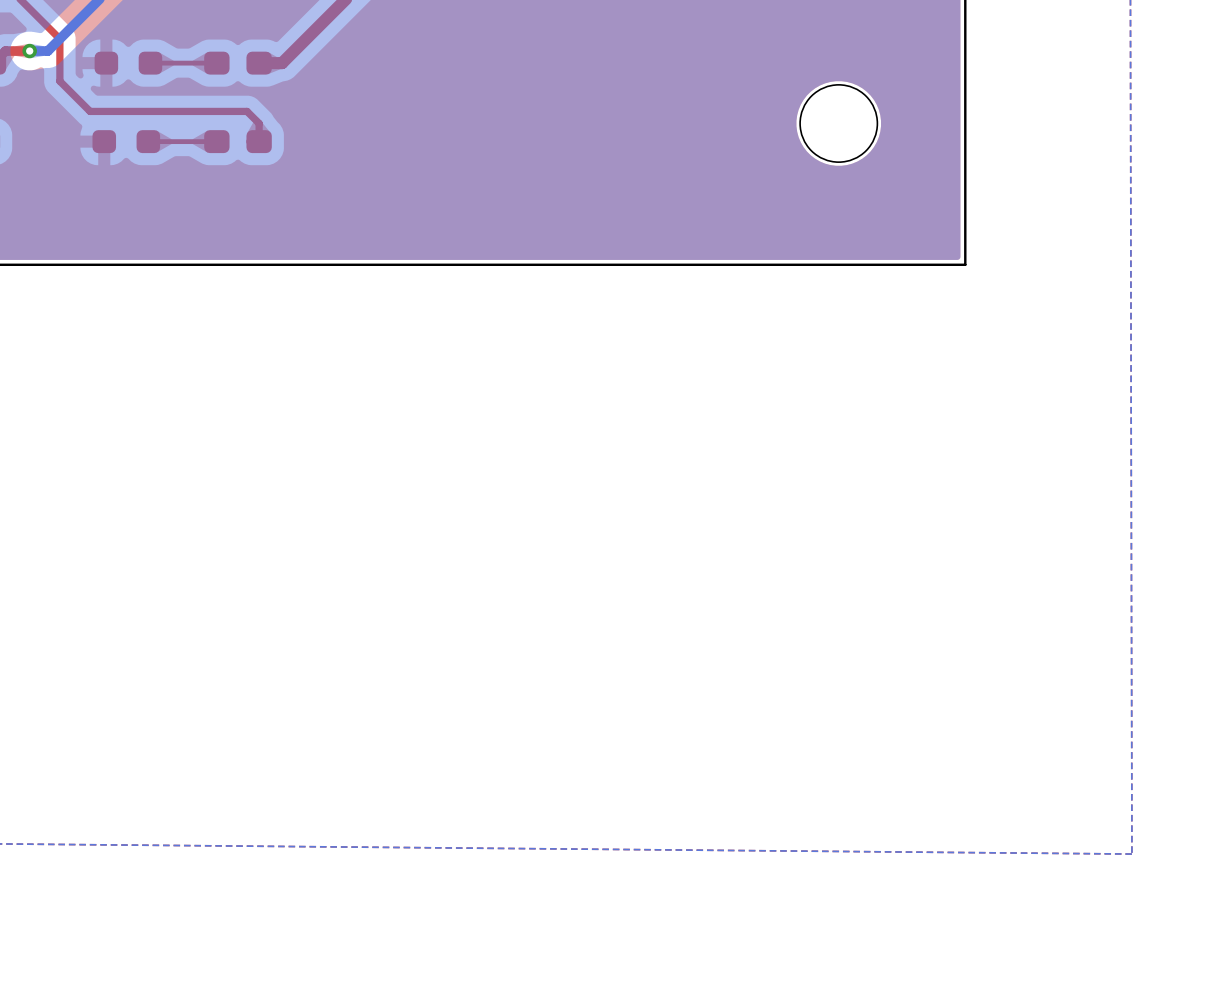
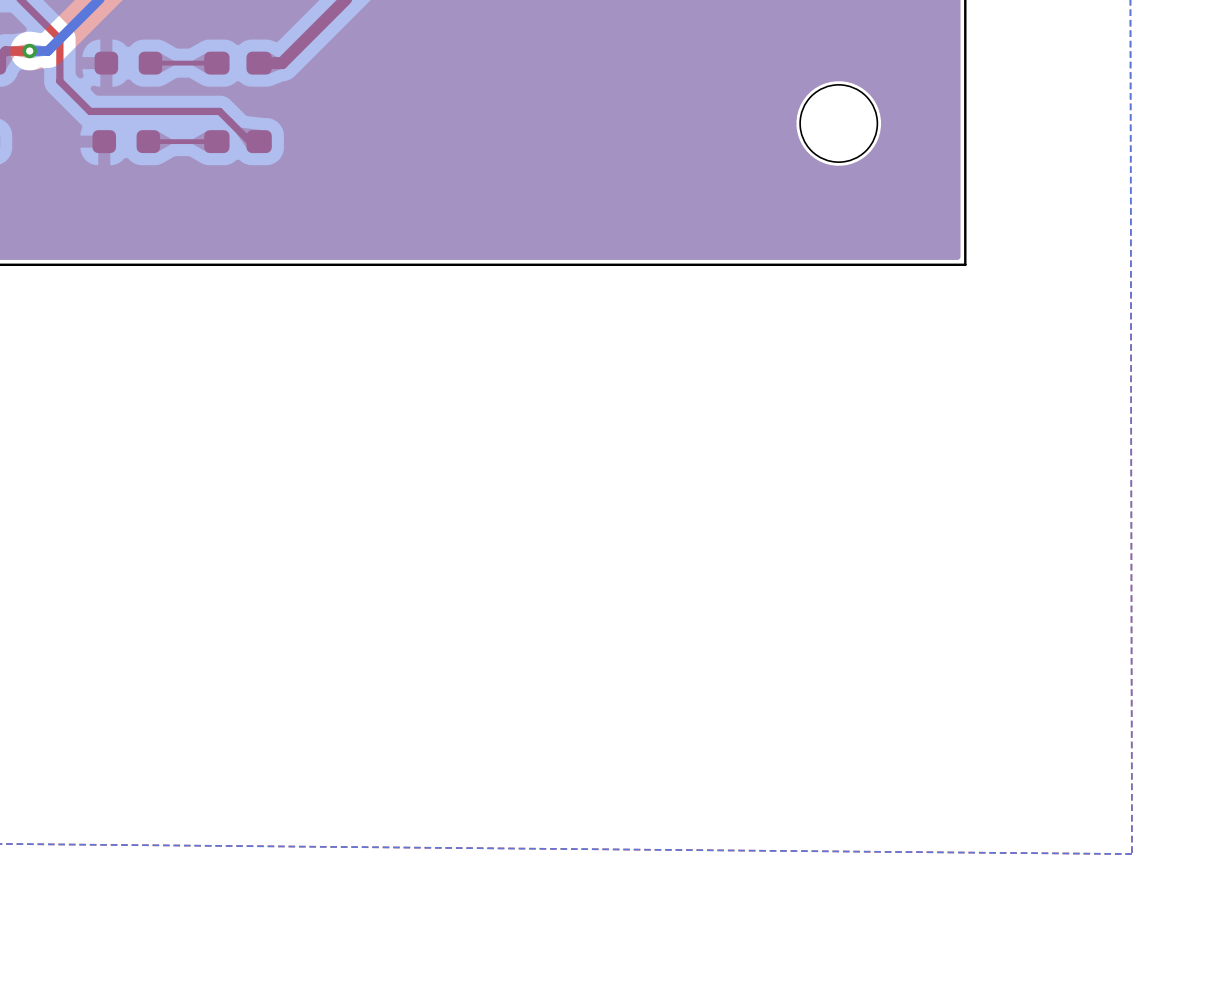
top track: (219, 111) (247, 111) (259, 123) (259, 141) -> (219, 111) (228, 120)
top track: none -> (229, 121) (249, 141)

